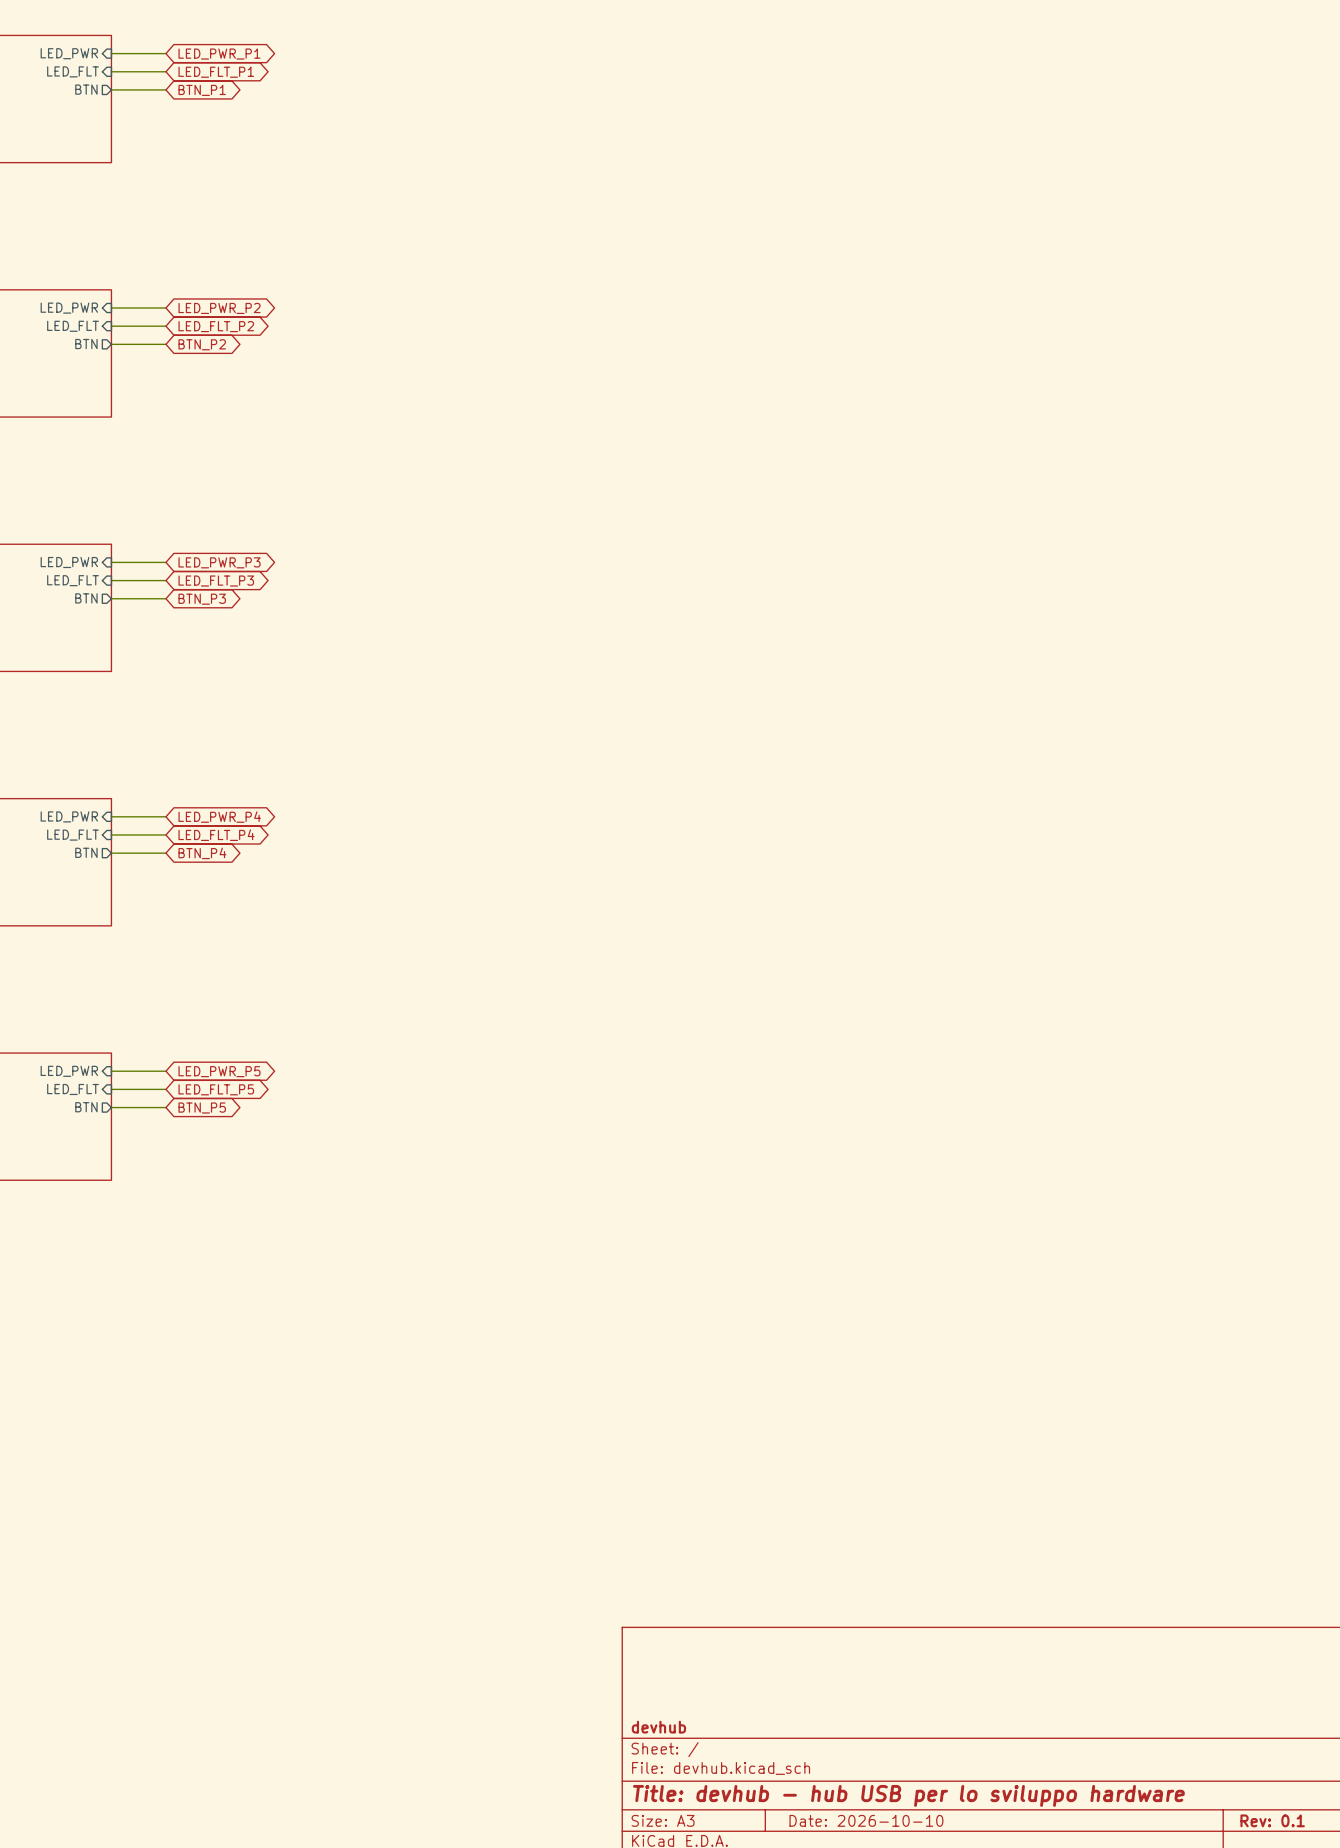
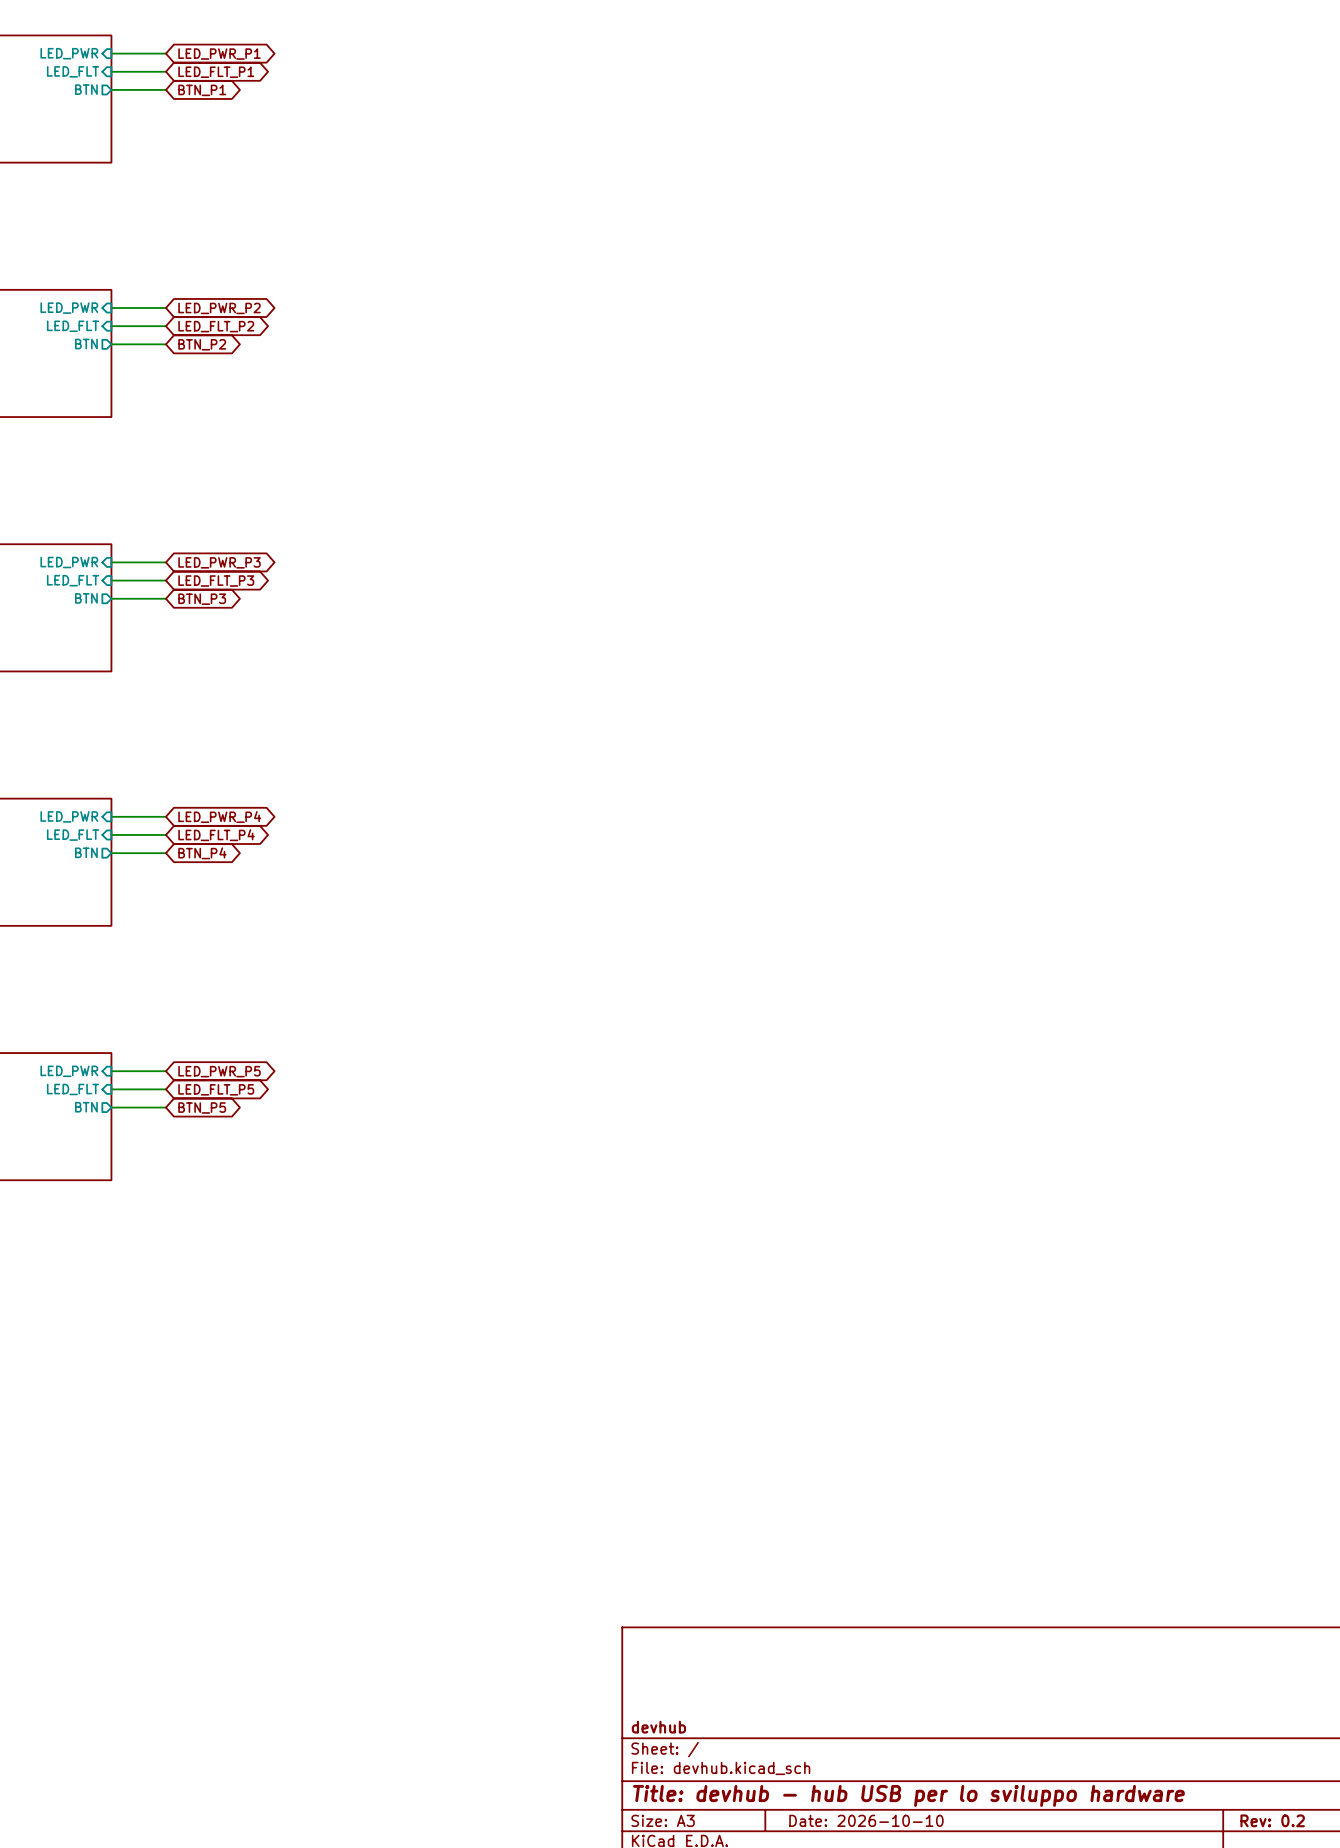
title block: Rev: 0.1 (1272, 1820) -> Rev: 0.2 (1272, 1820)

